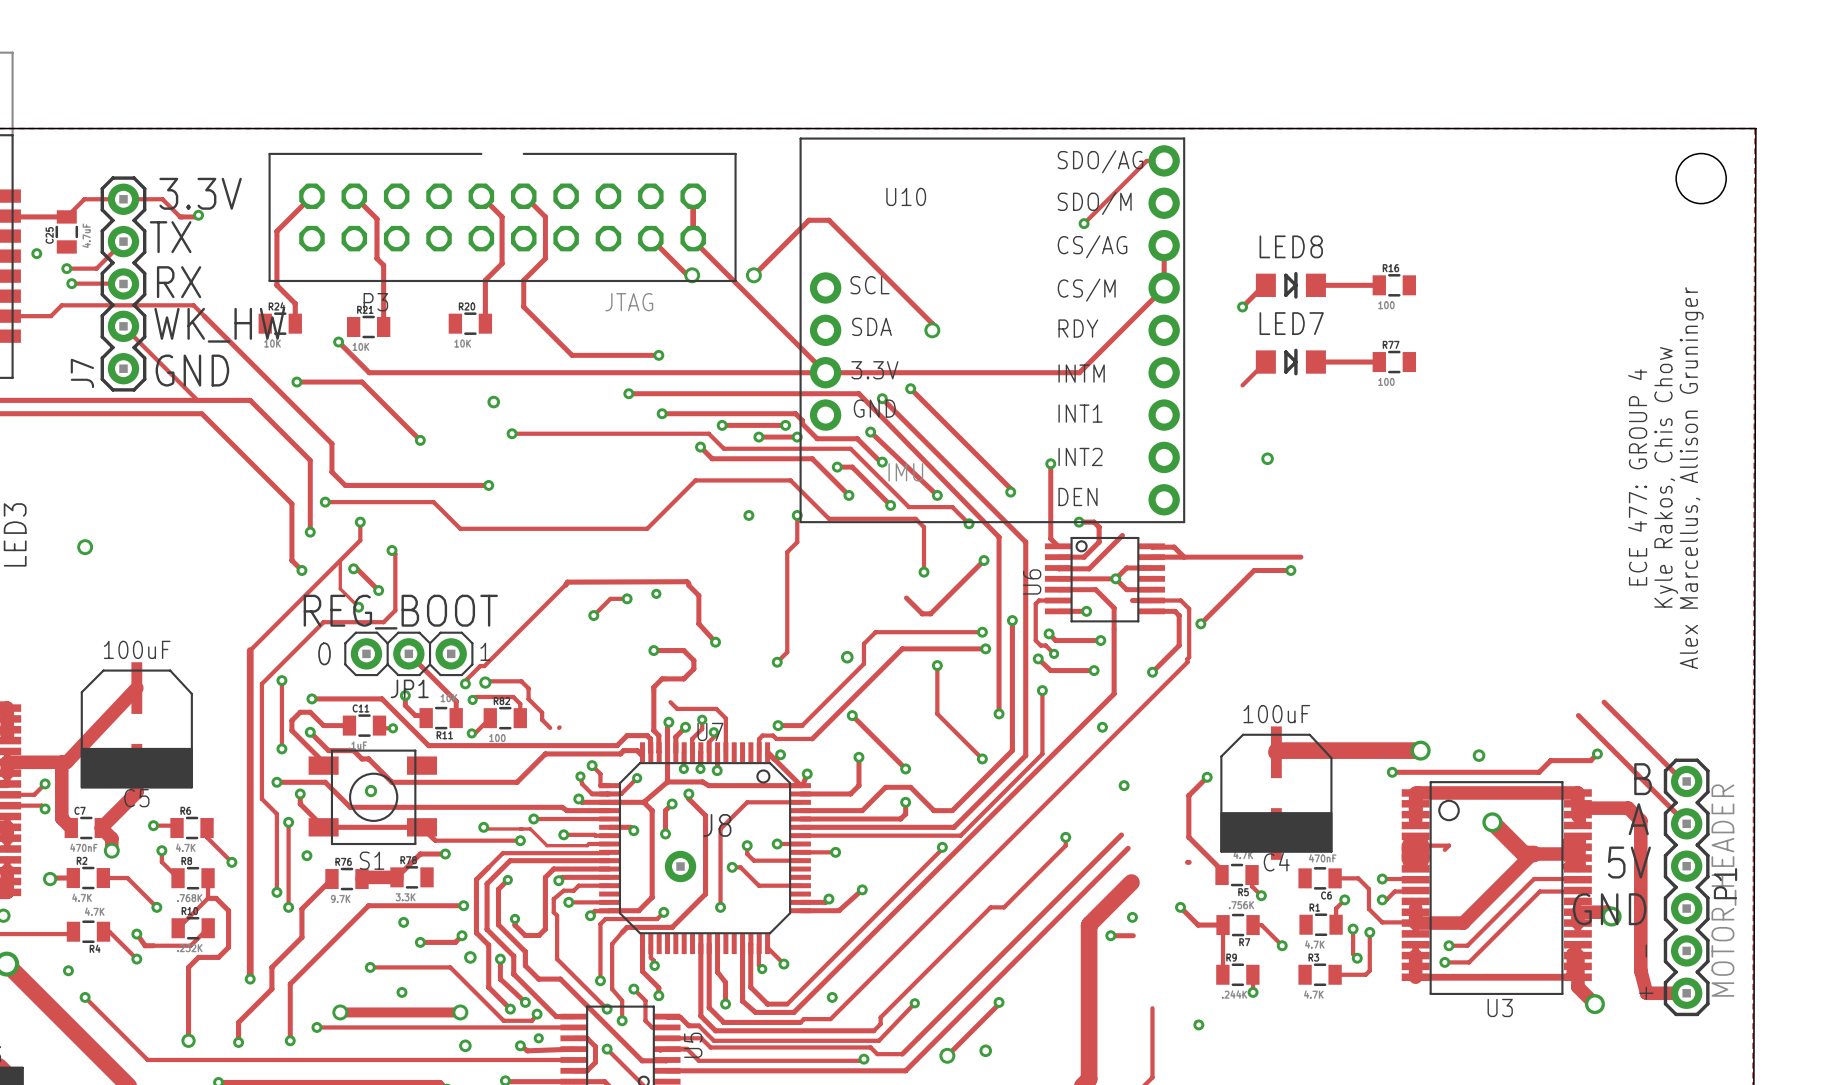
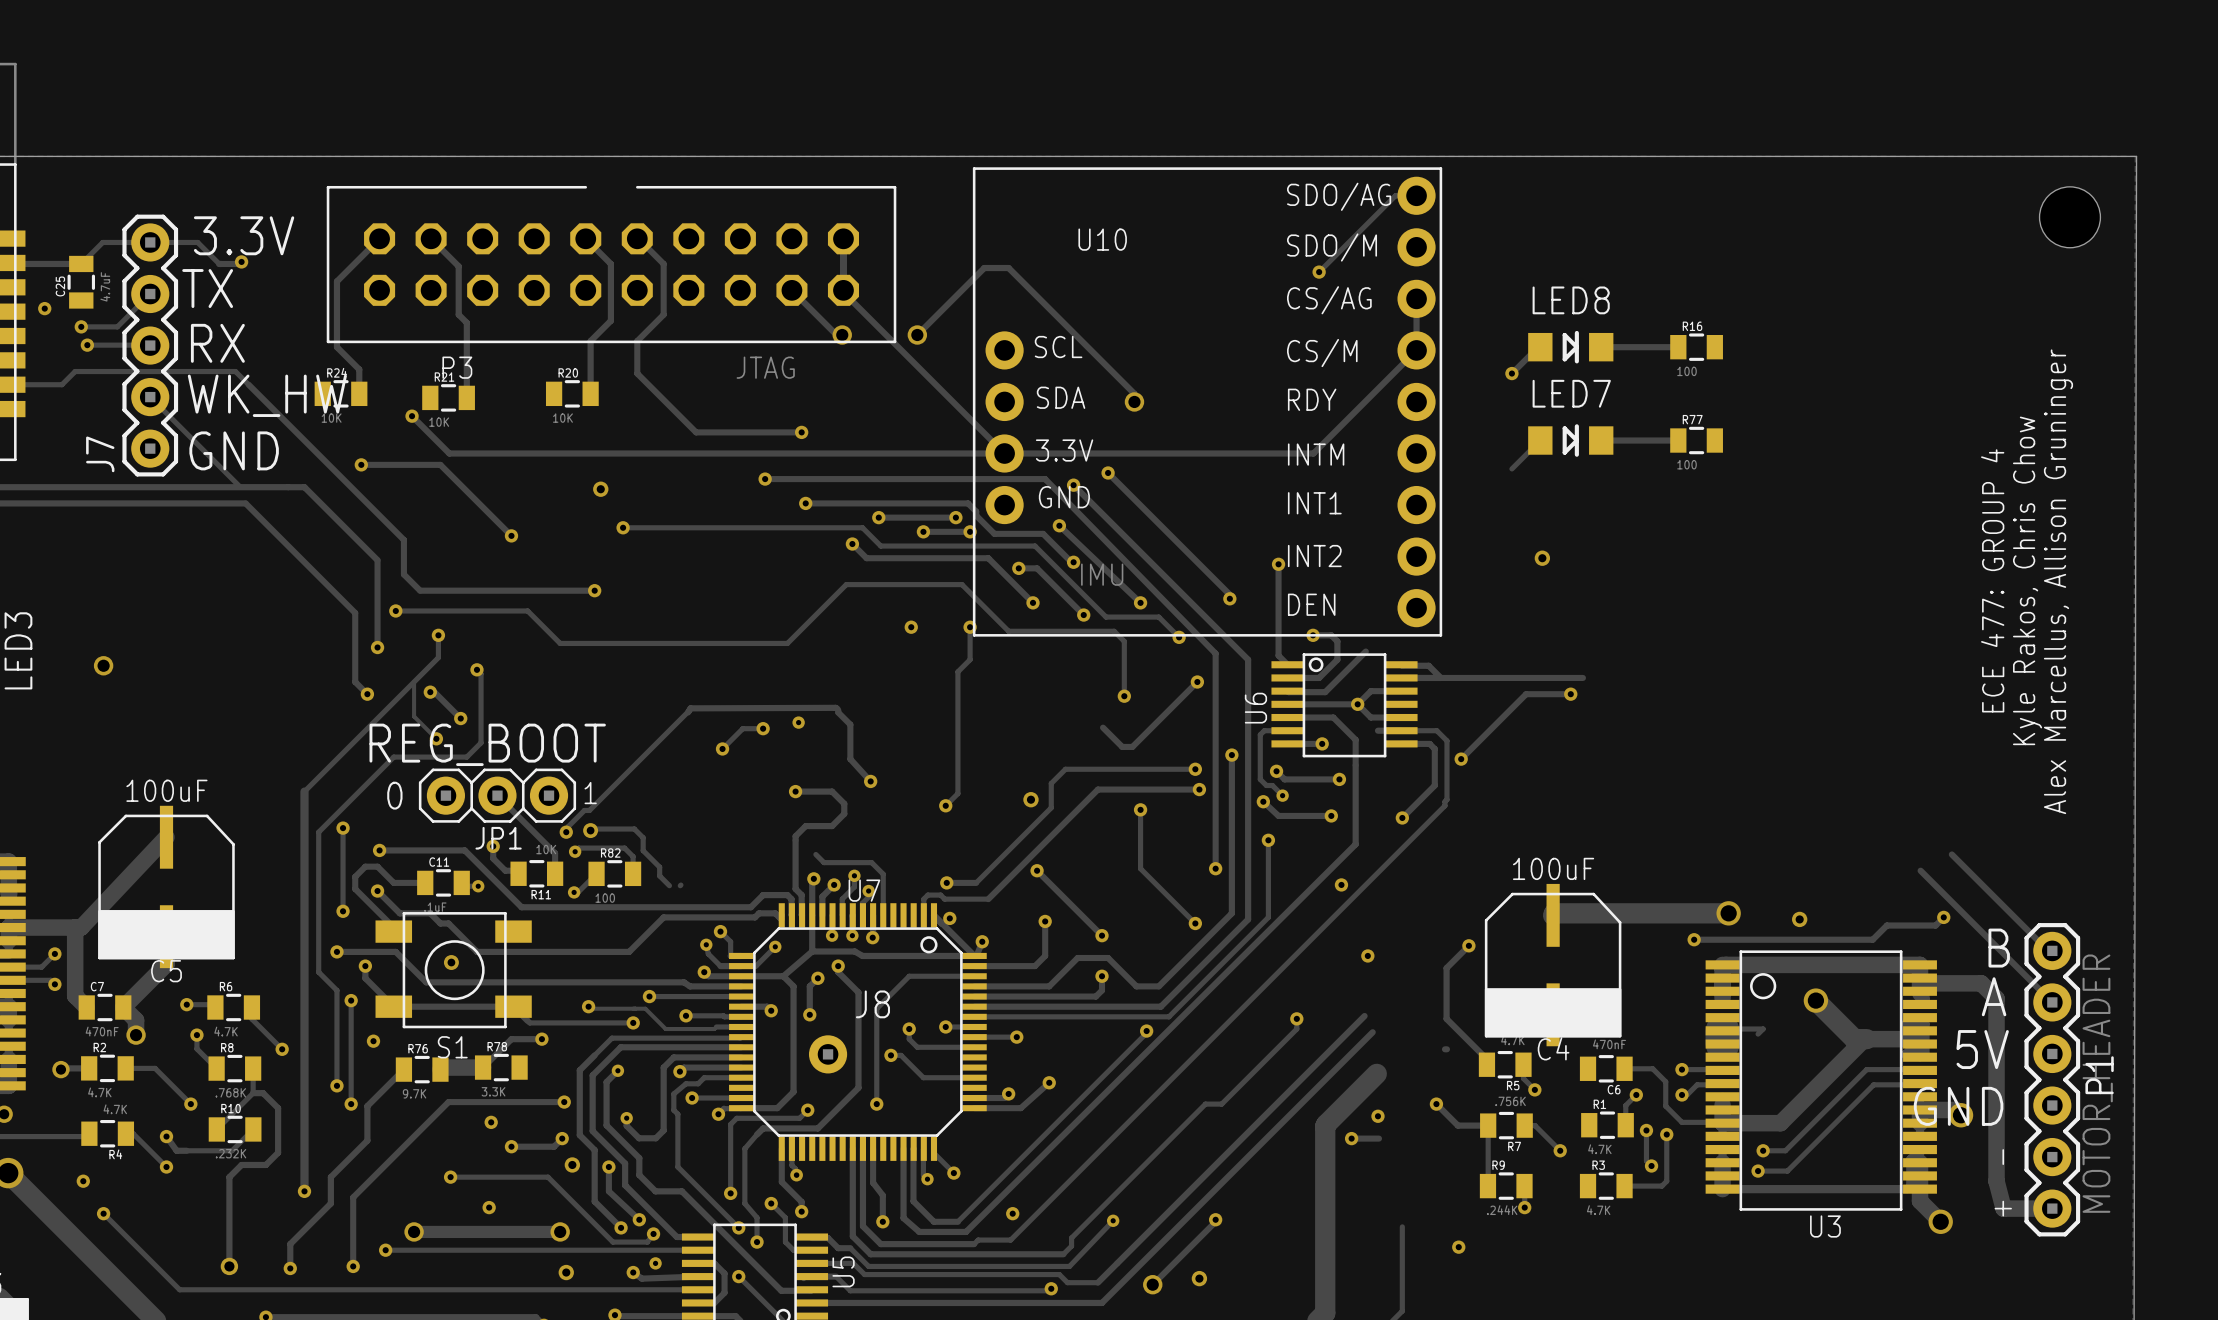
text: Kyle Rakos, Chis Chow (1666, 477) -> Kyle Rakos, Chris Chow (2027, 580)

